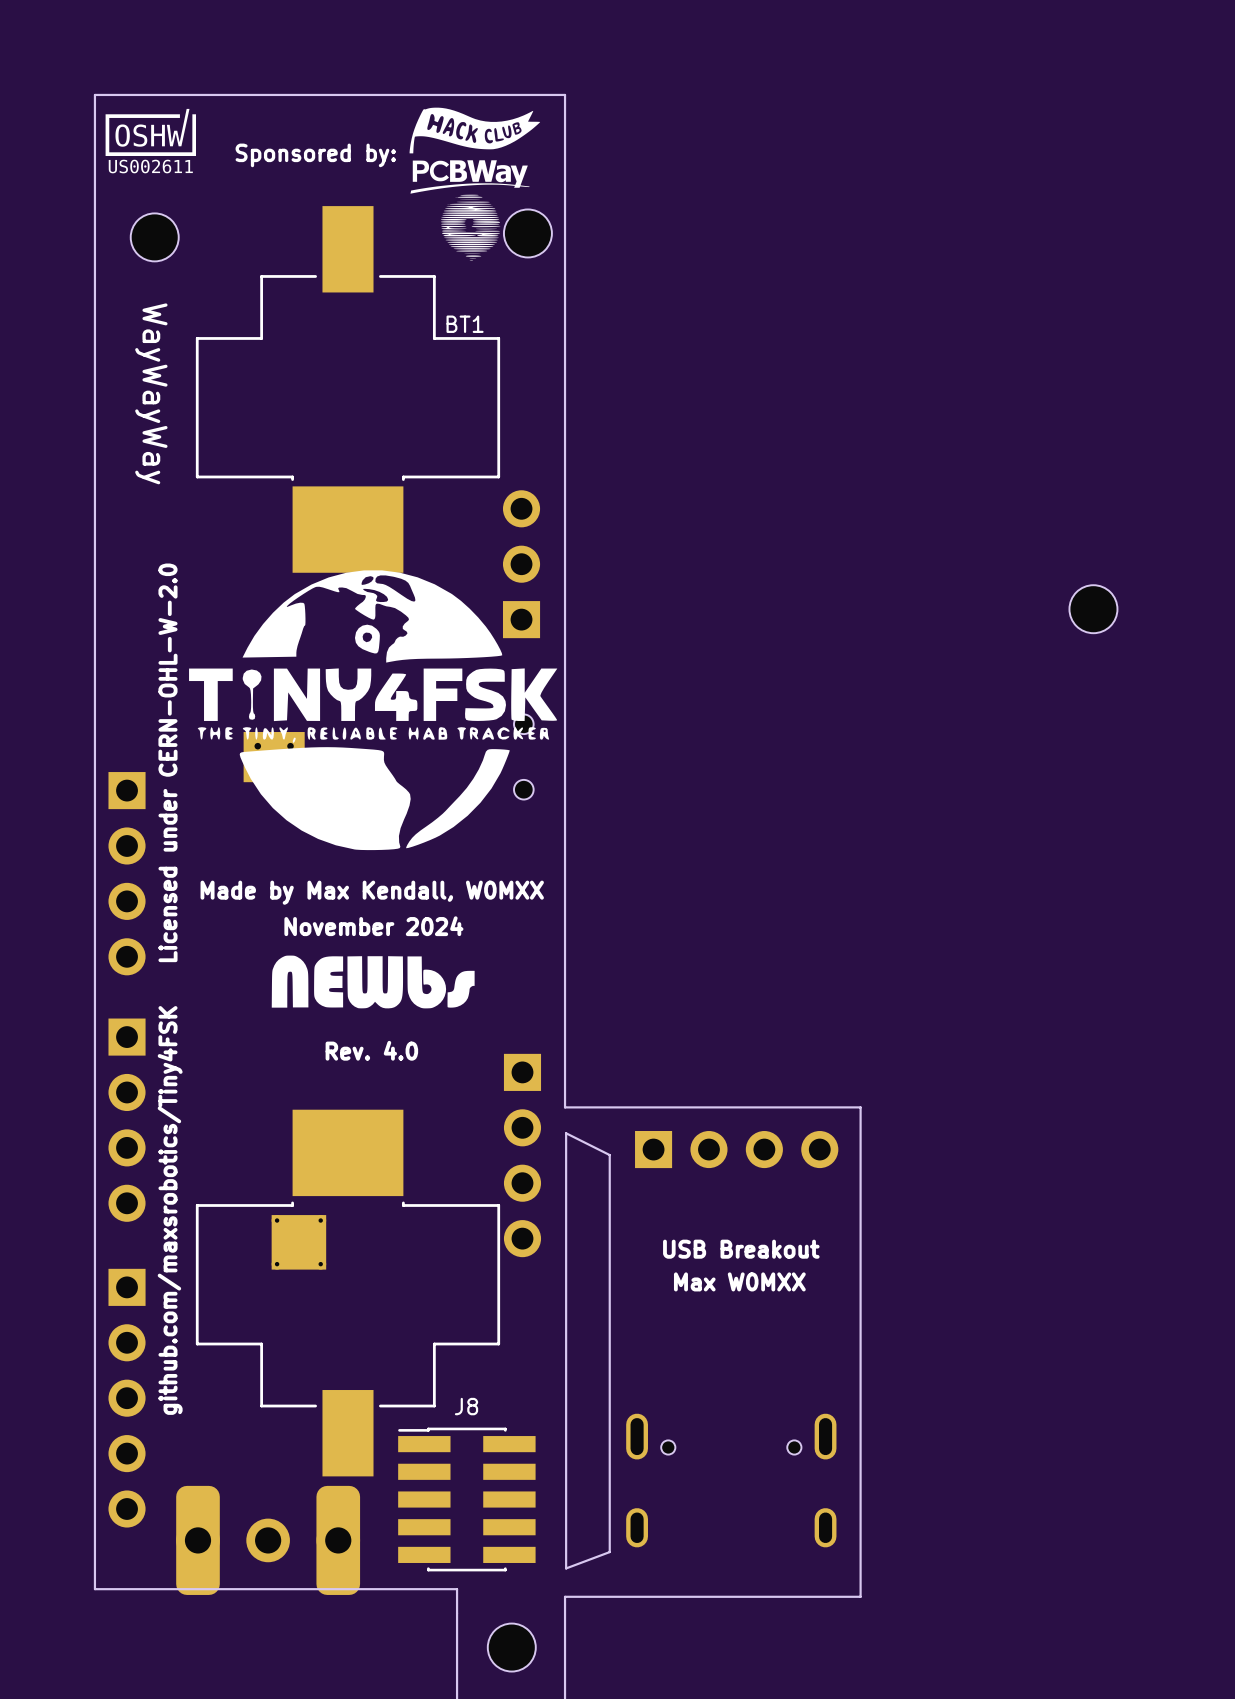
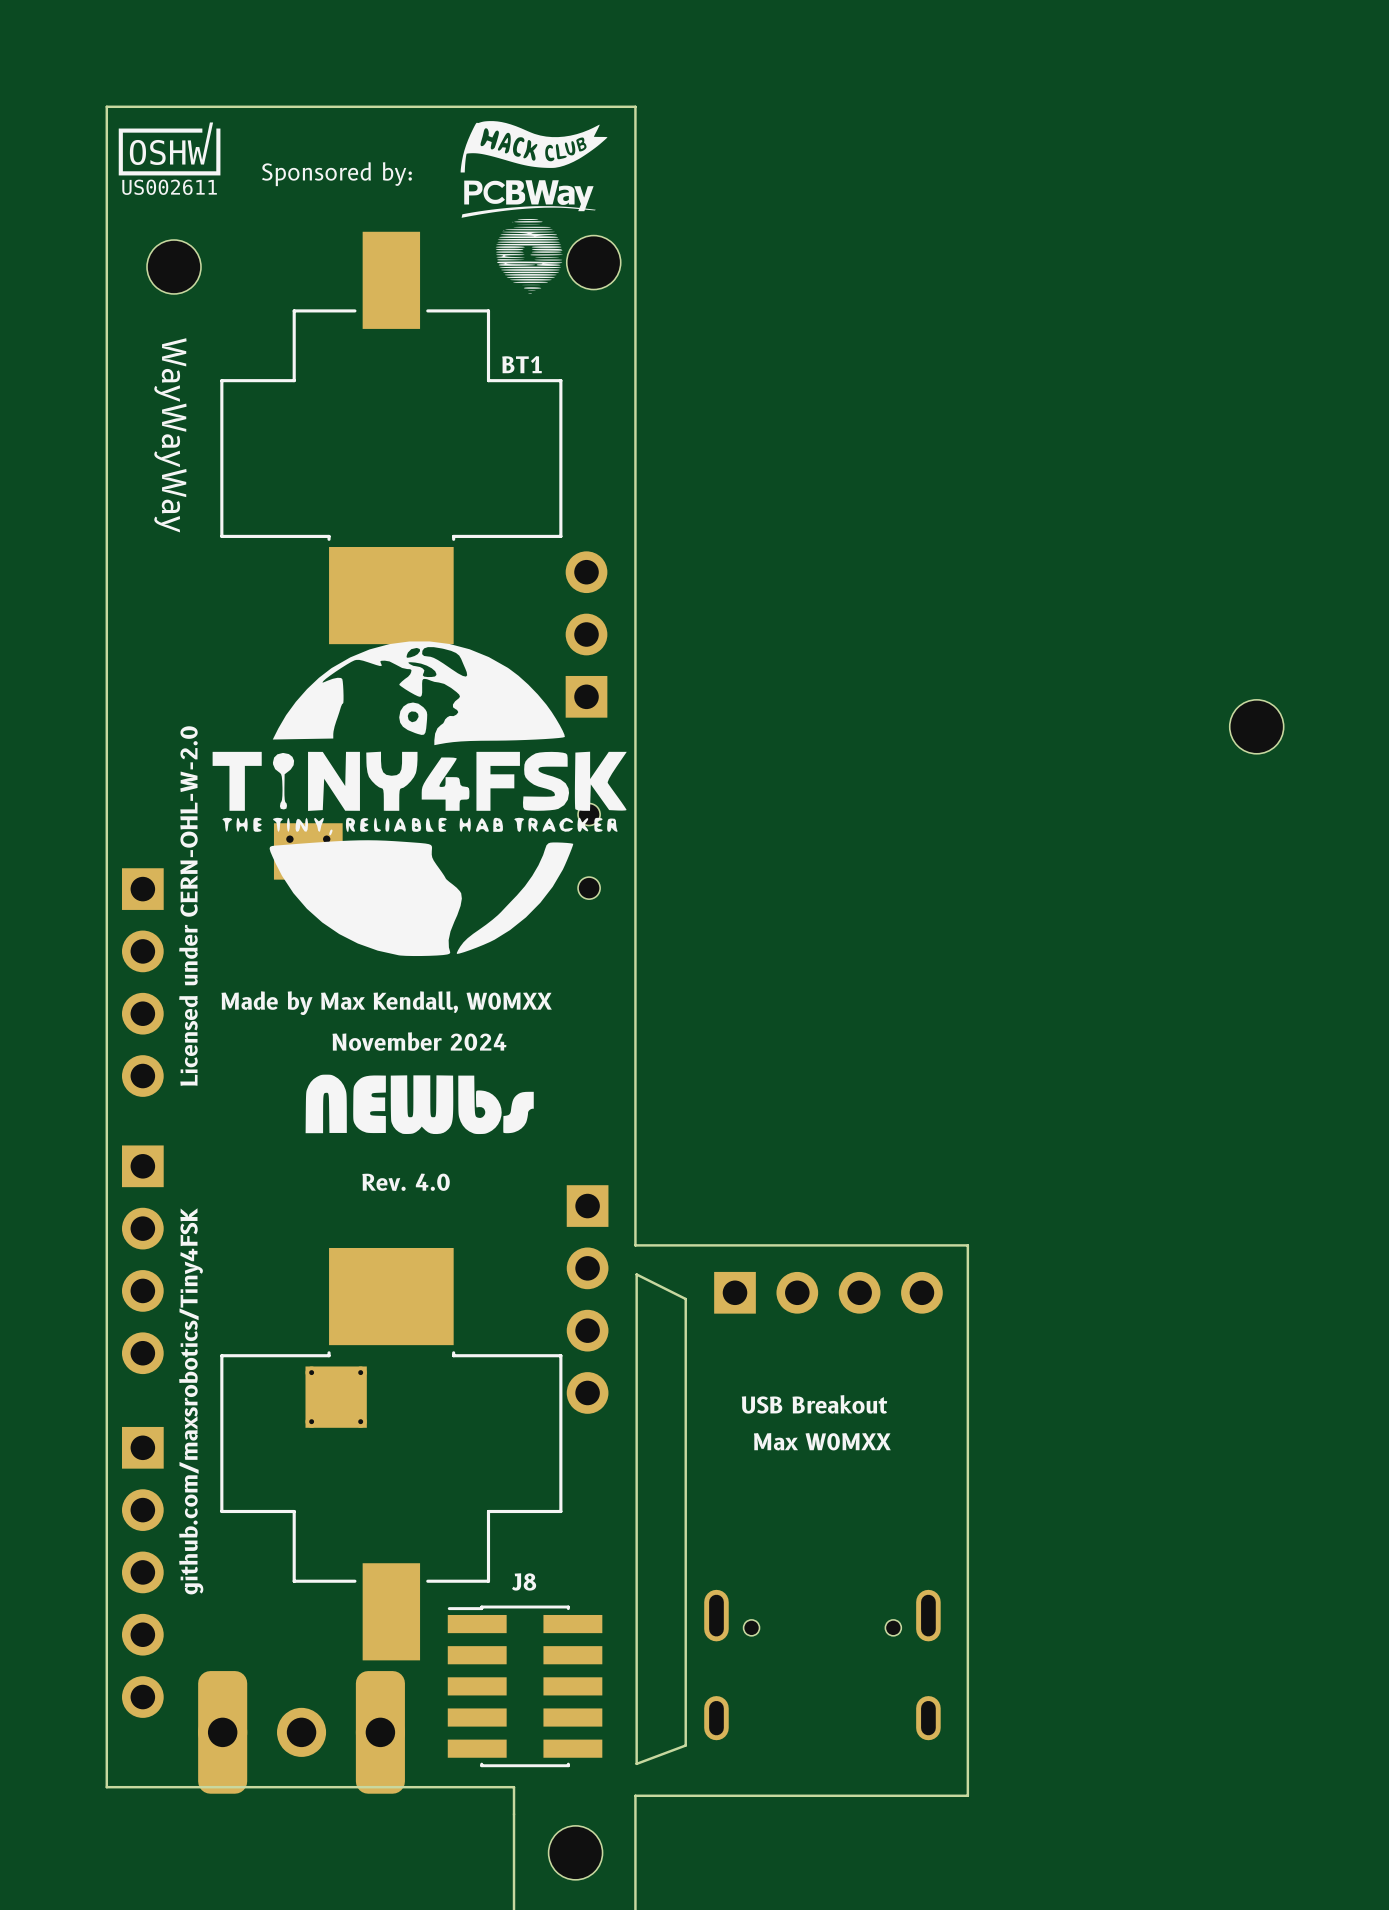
part position: (1093, 609) -> (1256, 726)

